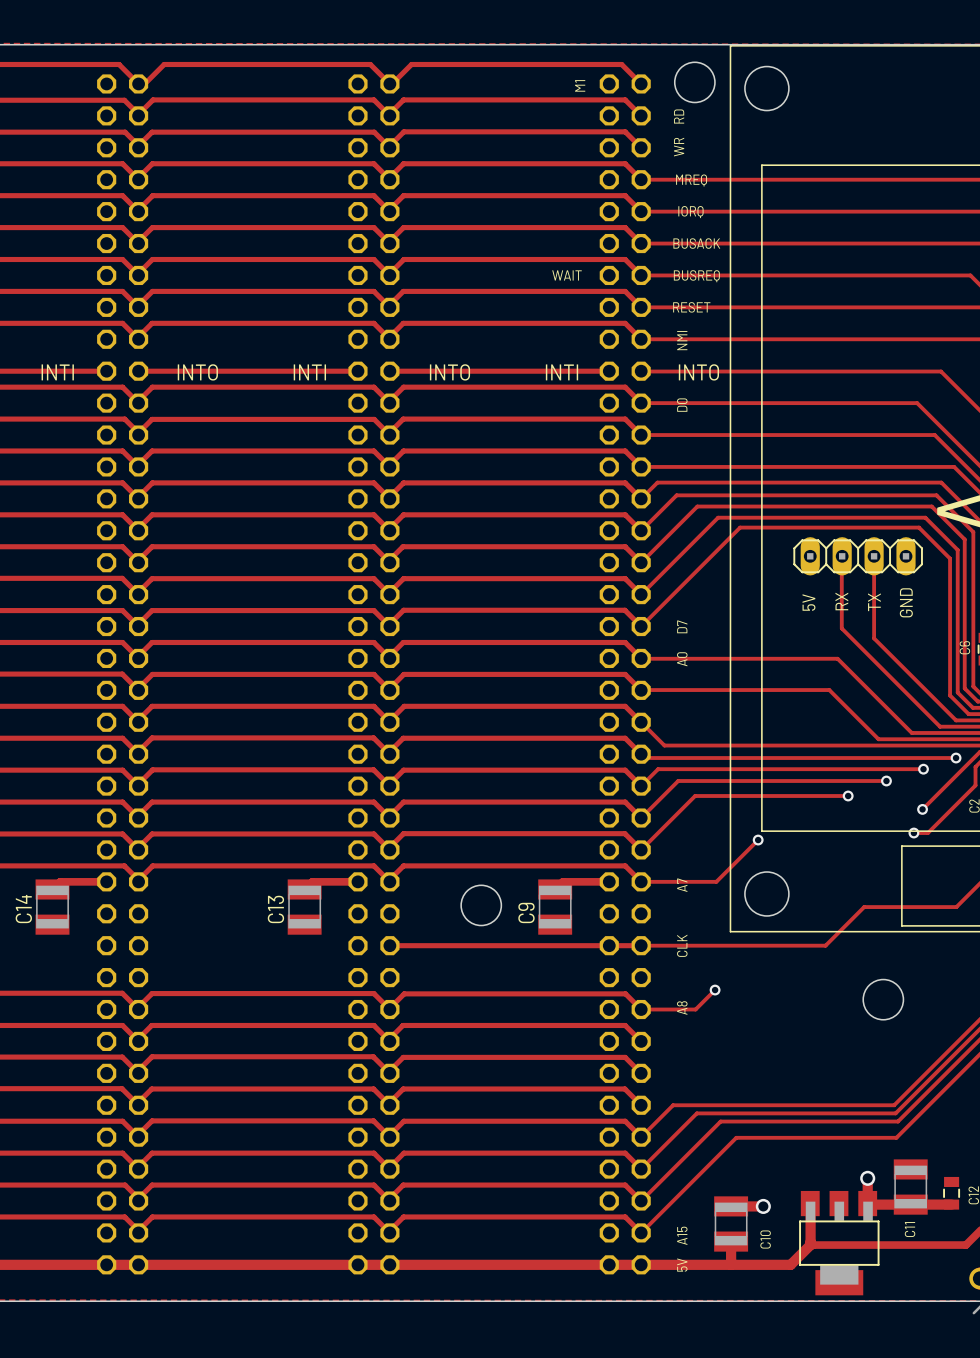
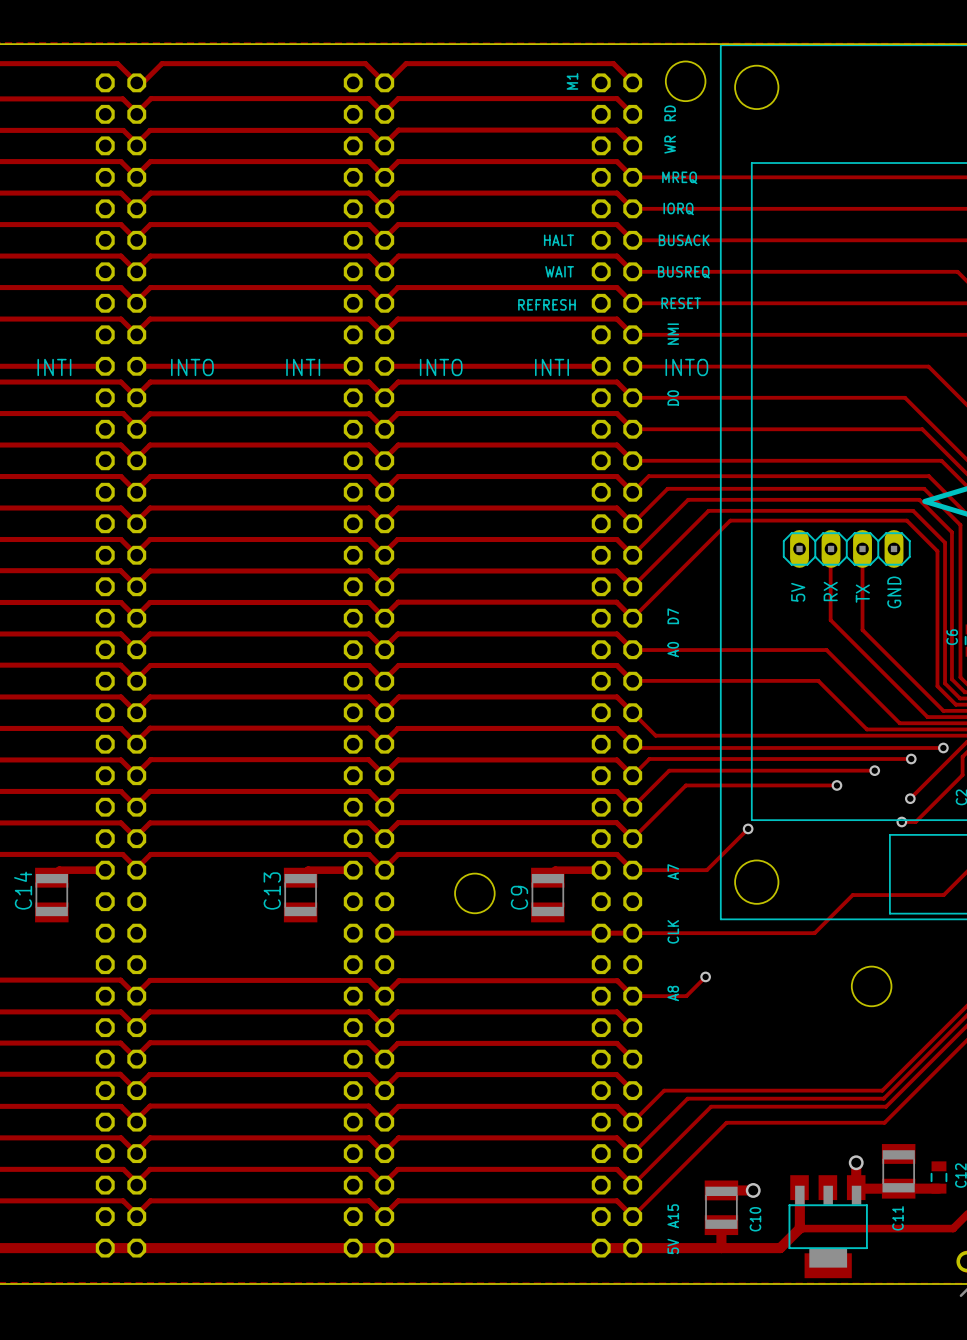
text: none -> HALT (558, 240)
text: none -> REFRESH (546, 304)

